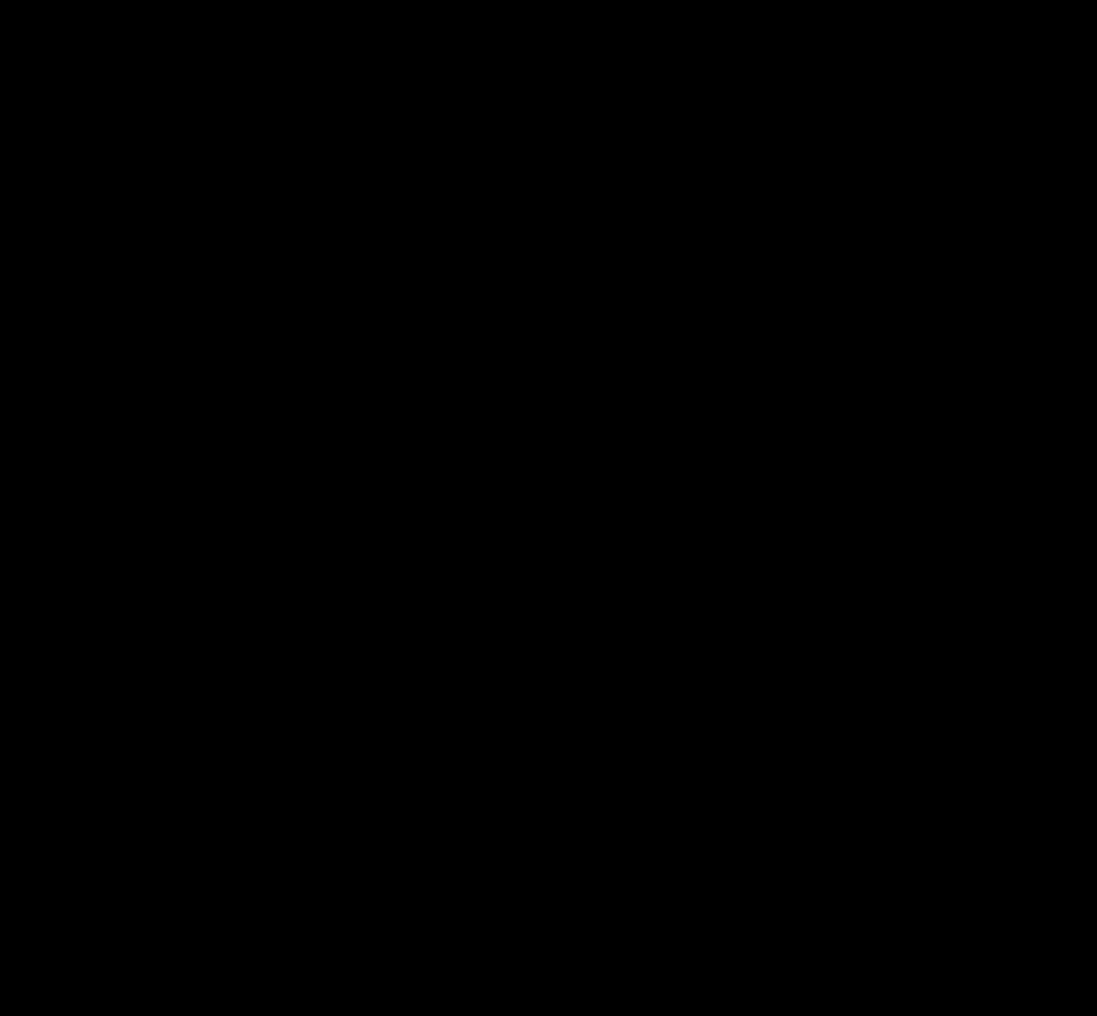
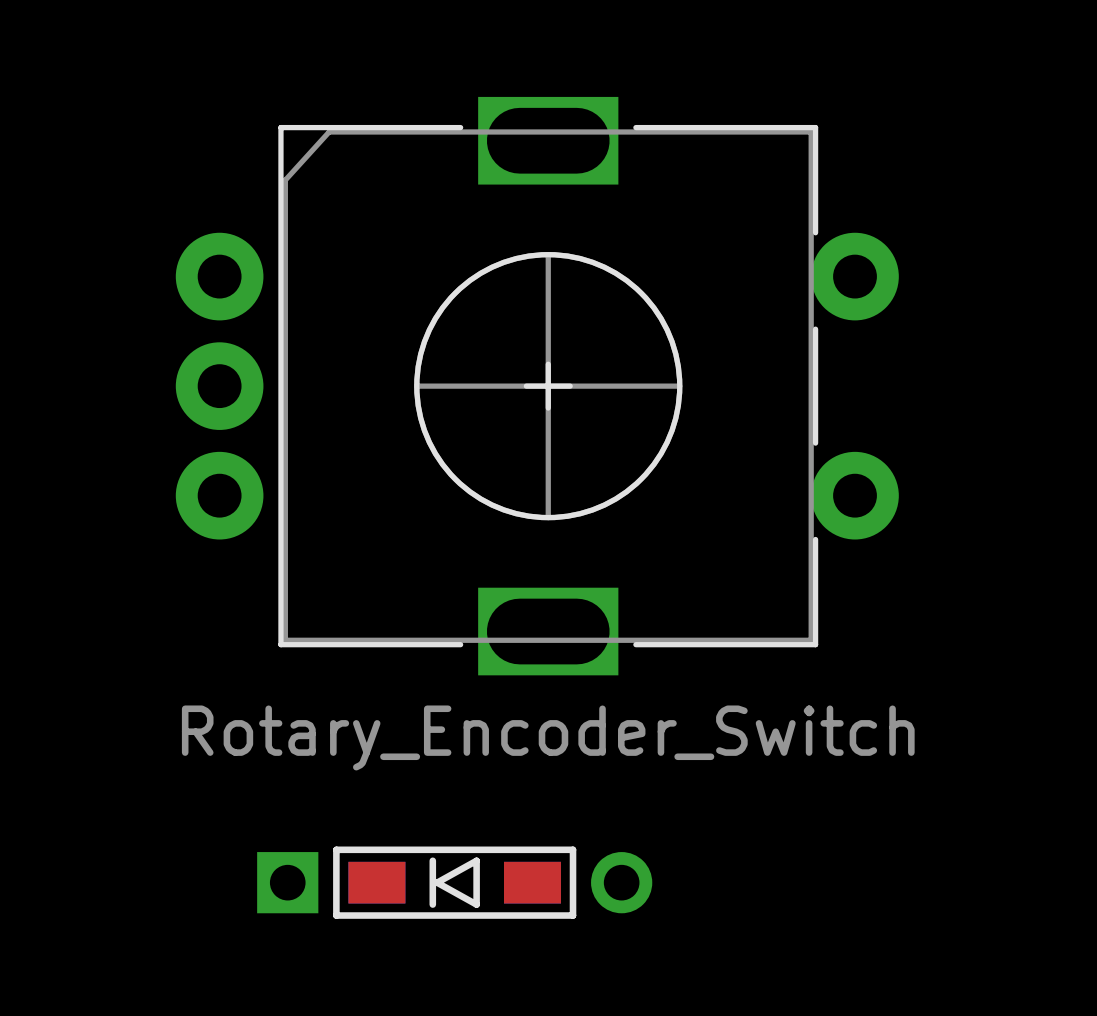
part: none -> Rotary_Encoder_Switch (537, 386)
part: none -> (454, 882)

